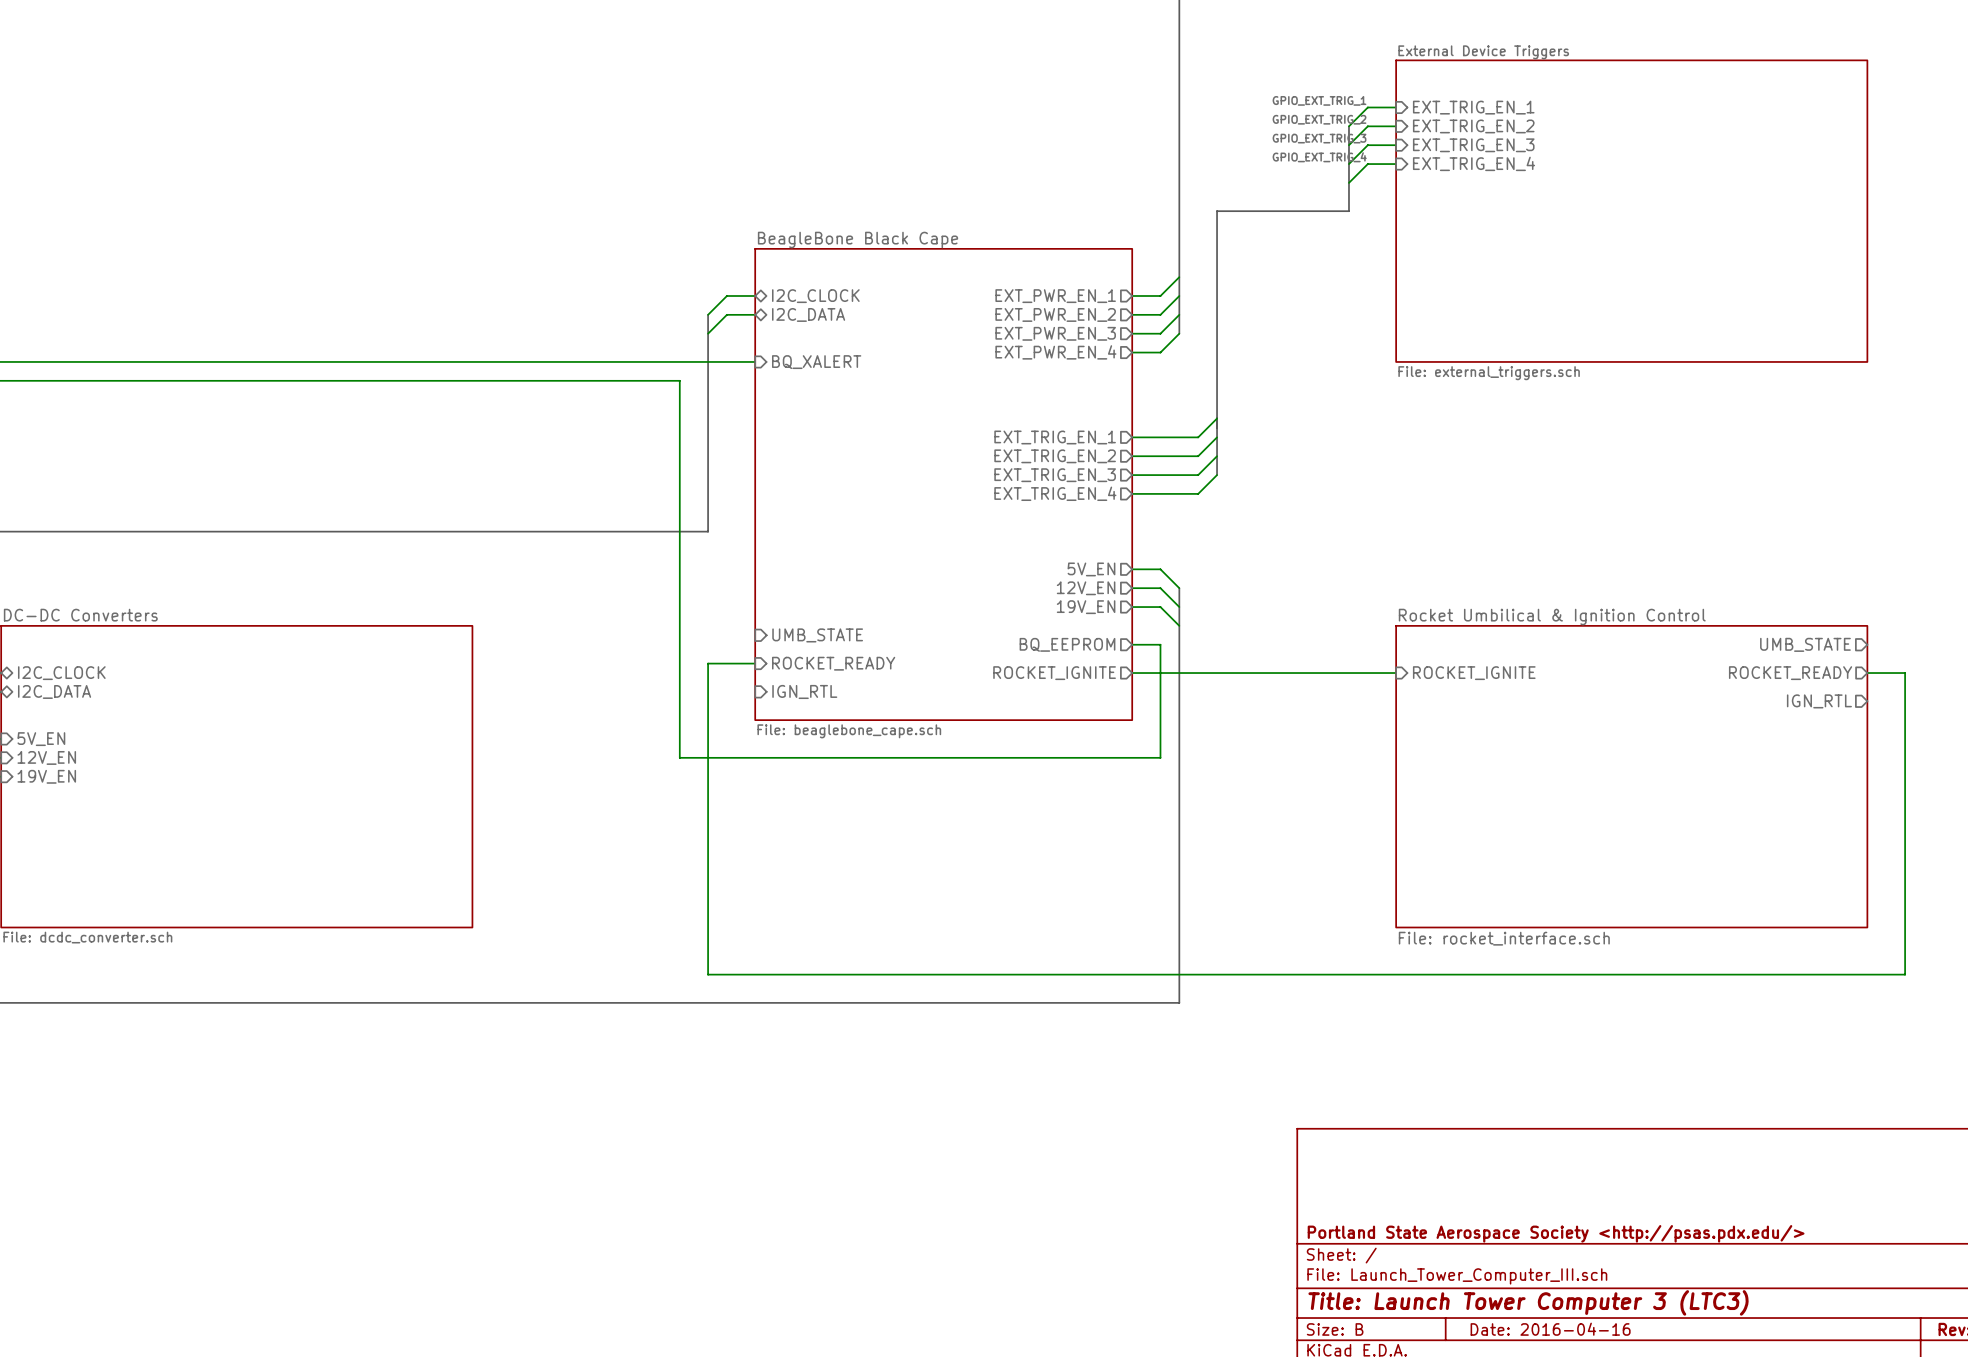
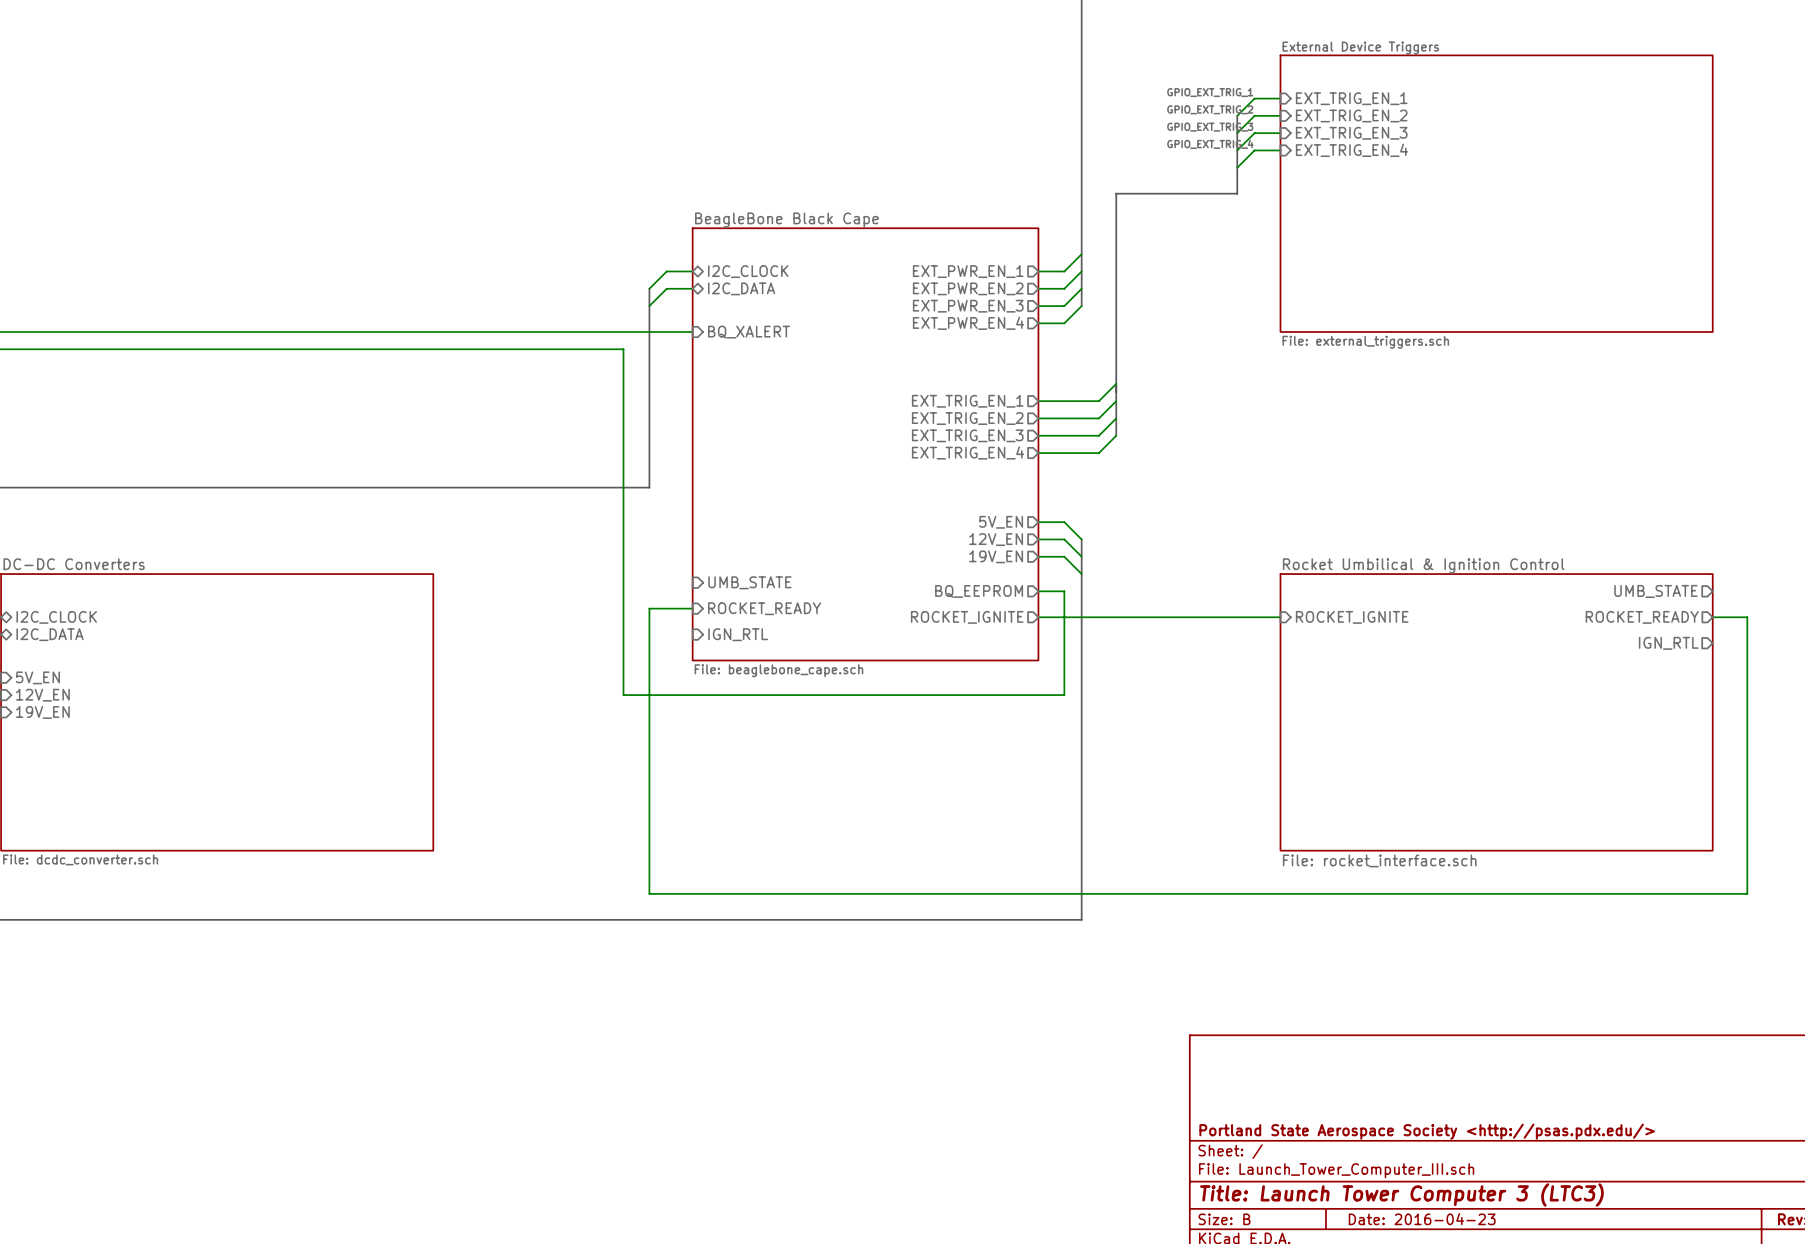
title block: Date: 2016-04-16 (1550, 1329) -> Date: 2016-04-23 (1422, 1219)

